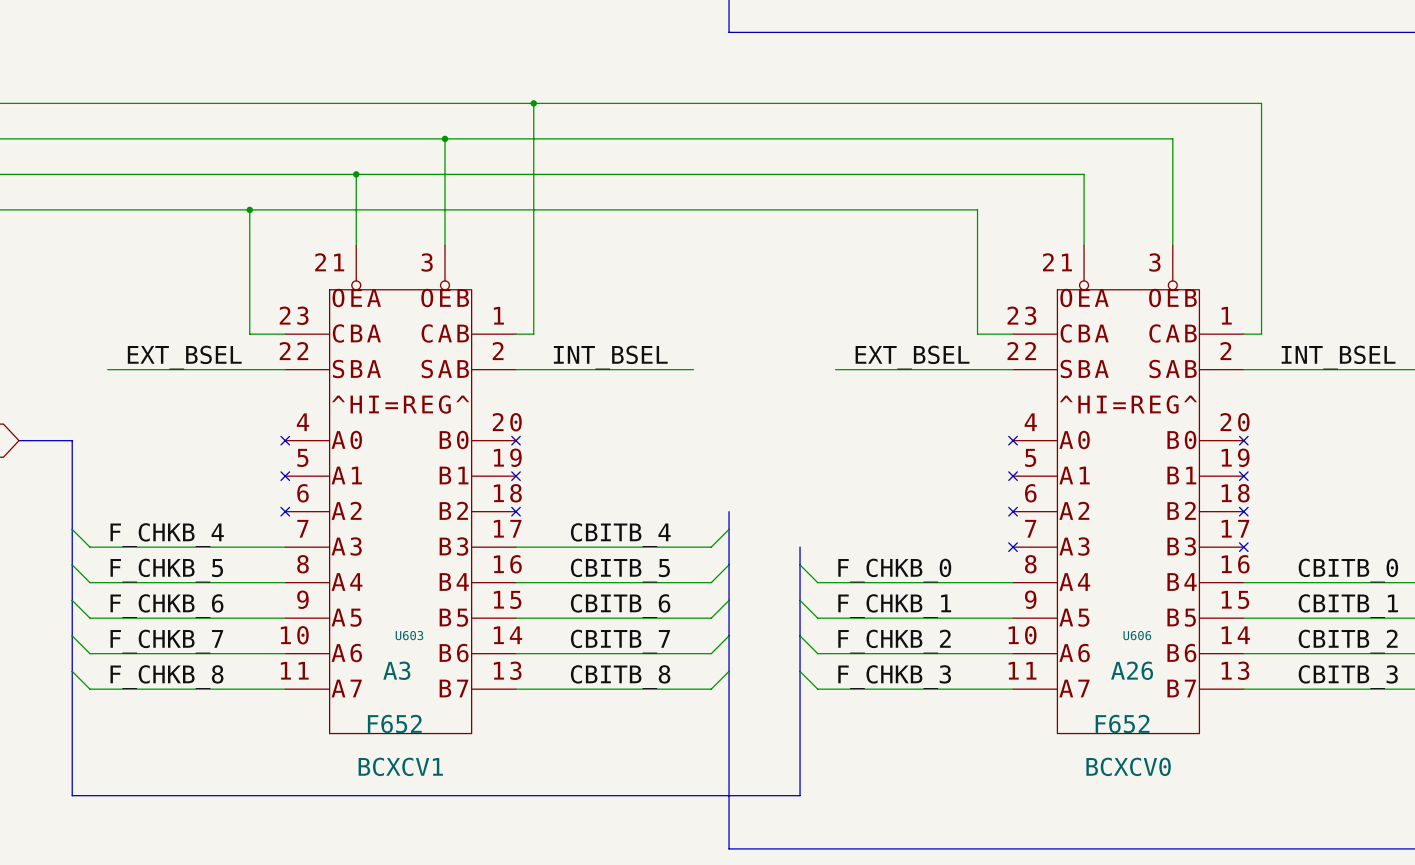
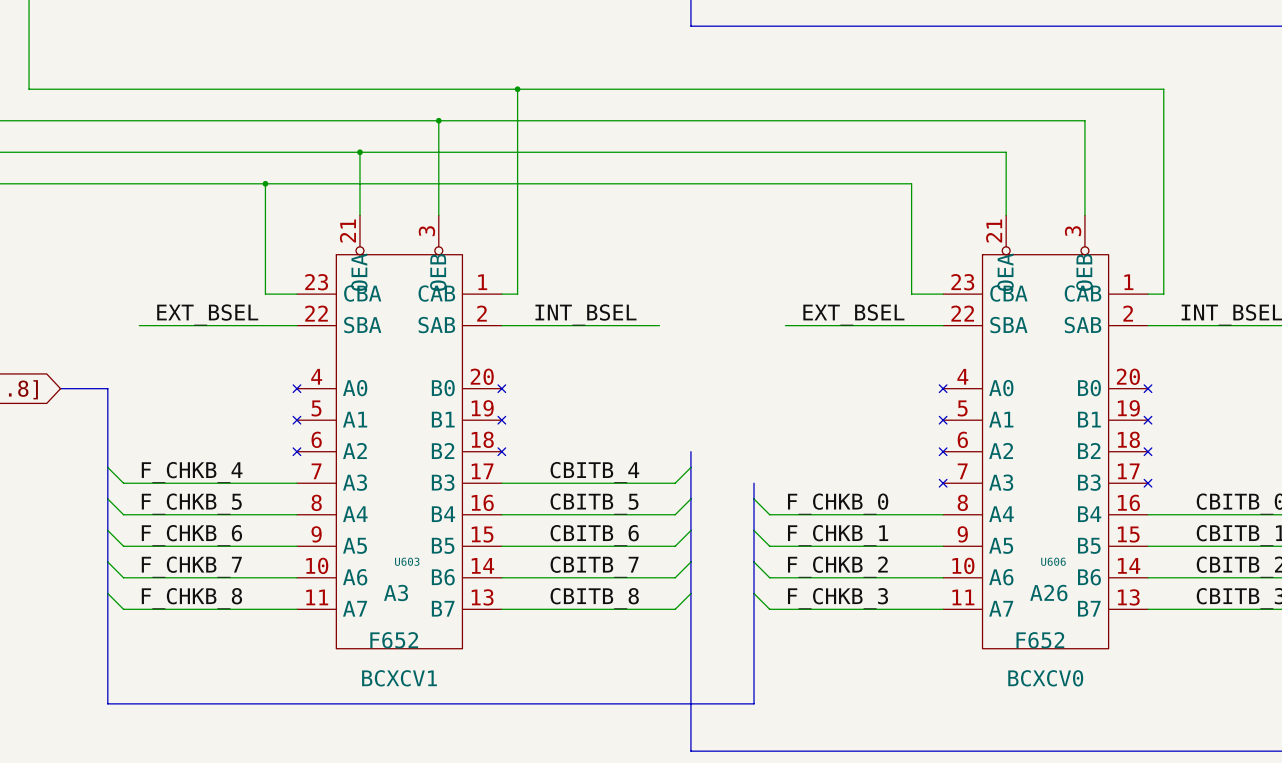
U603 symbol: [285, 245, 517, 734] -> [296, 215, 502, 649]
U606 symbol: [1013, 245, 1244, 734] -> [943, 215, 1149, 649]

